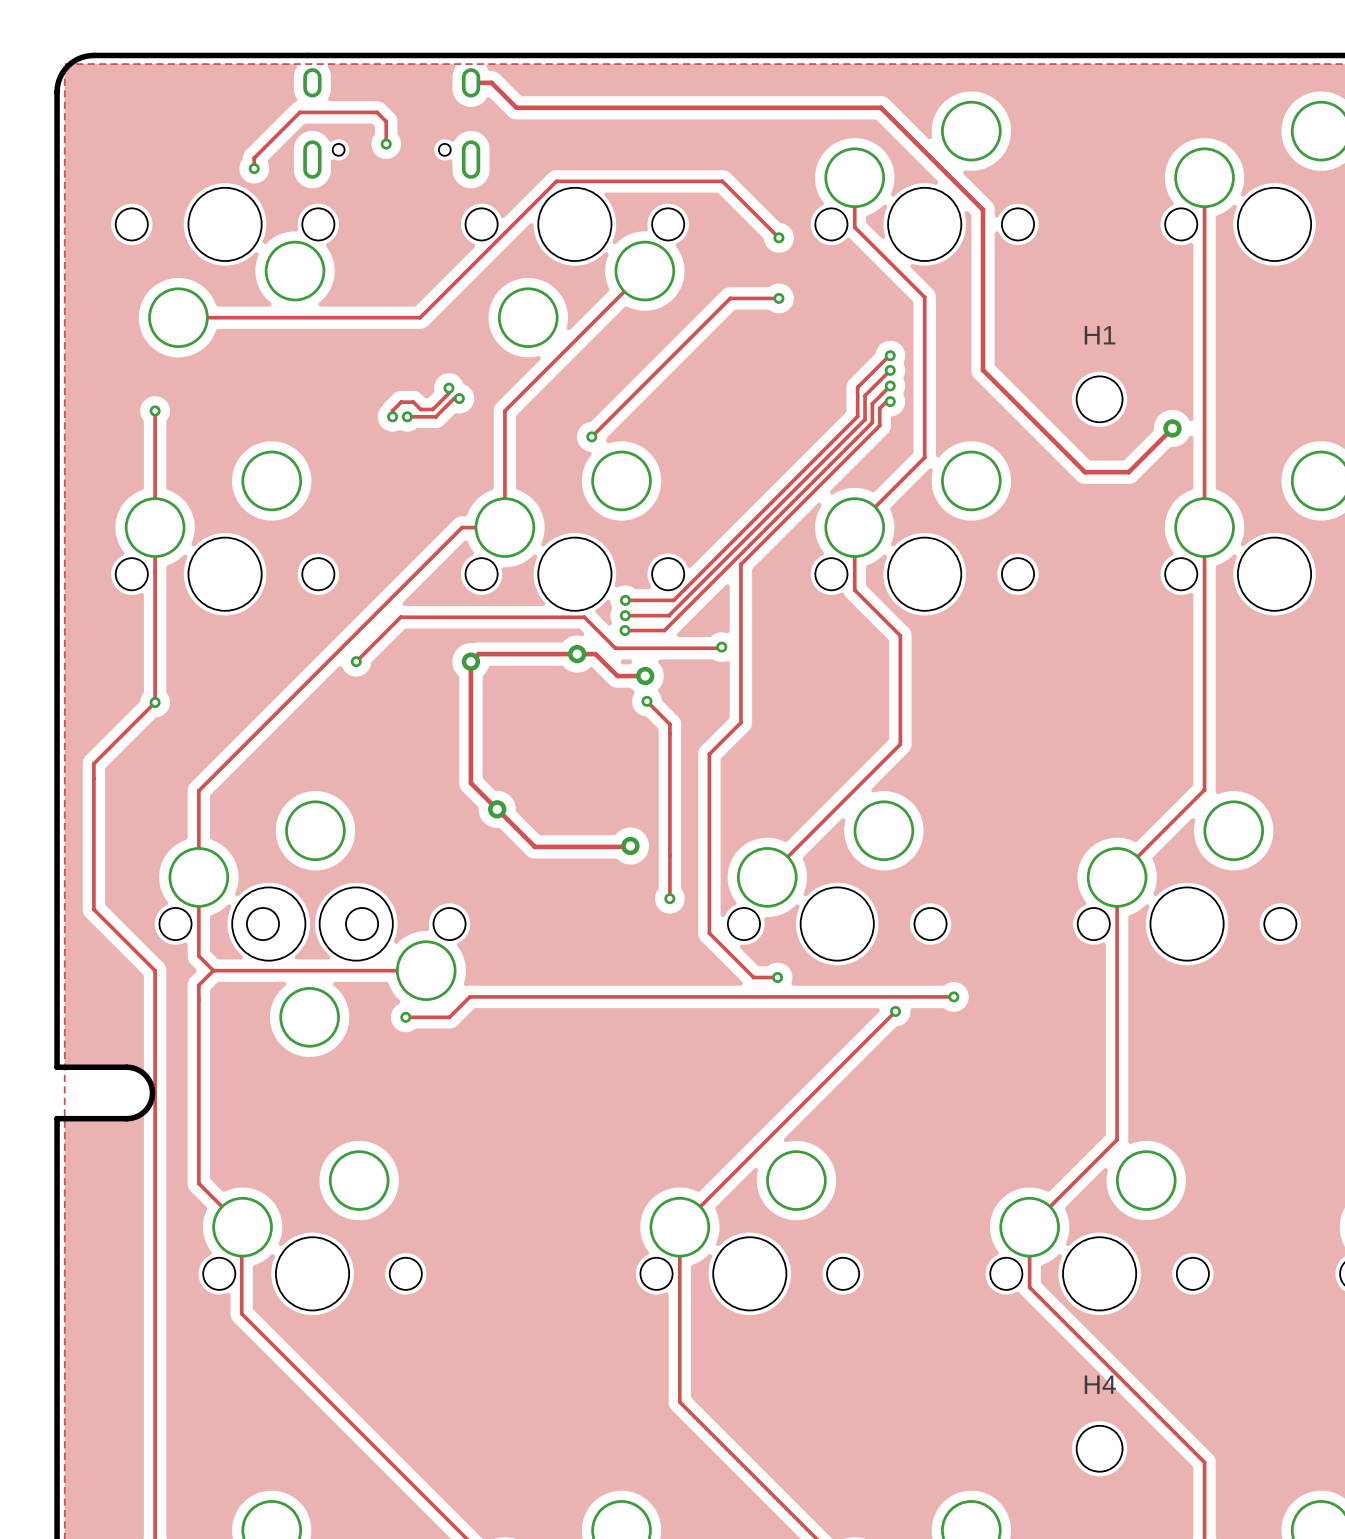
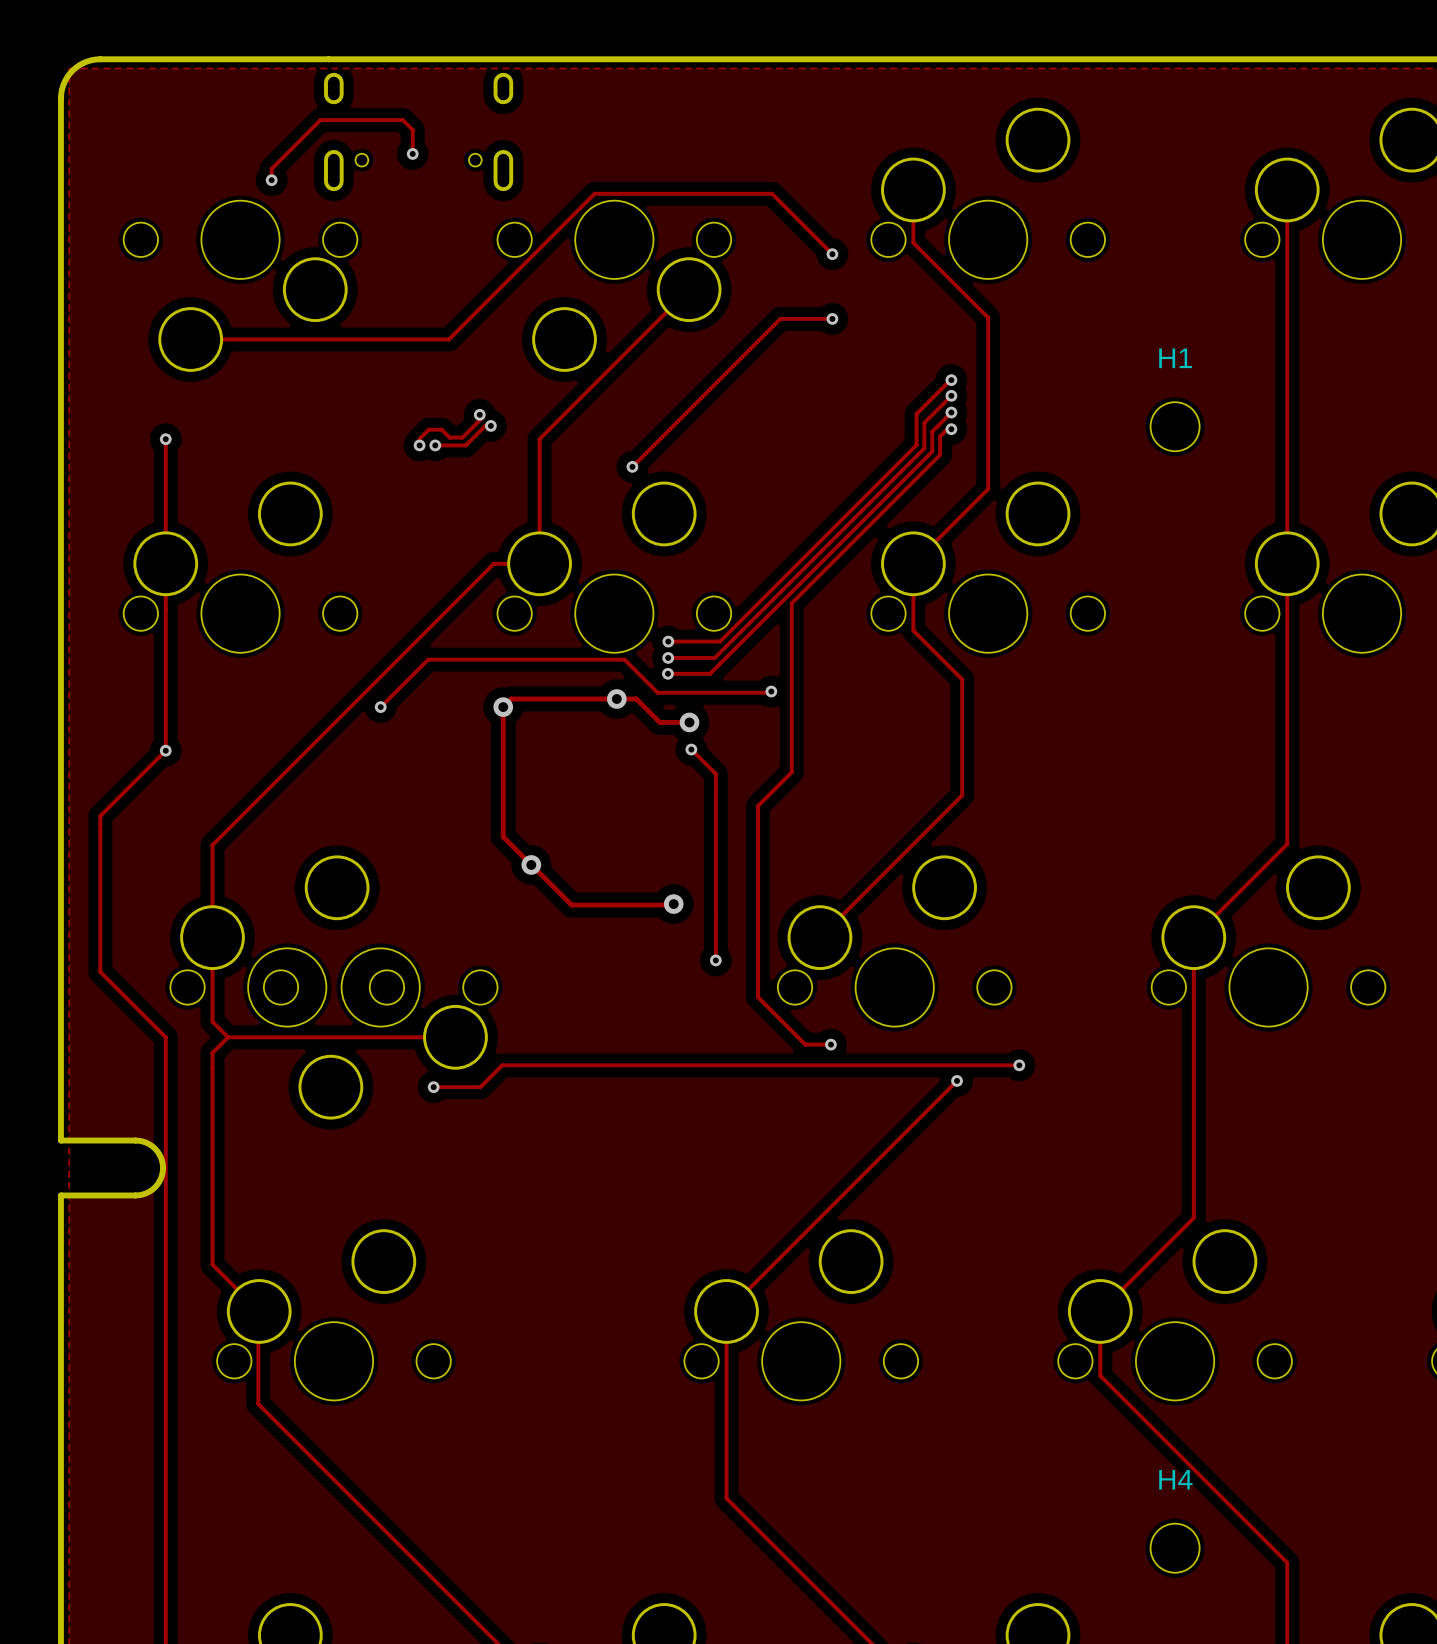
track: (471, 82) (491, 82) (516, 107) (880, 107) (983, 209) (983, 370) (1085, 472) (1128, 472) (1172, 428) -> none
via: (1172, 428) -> none

